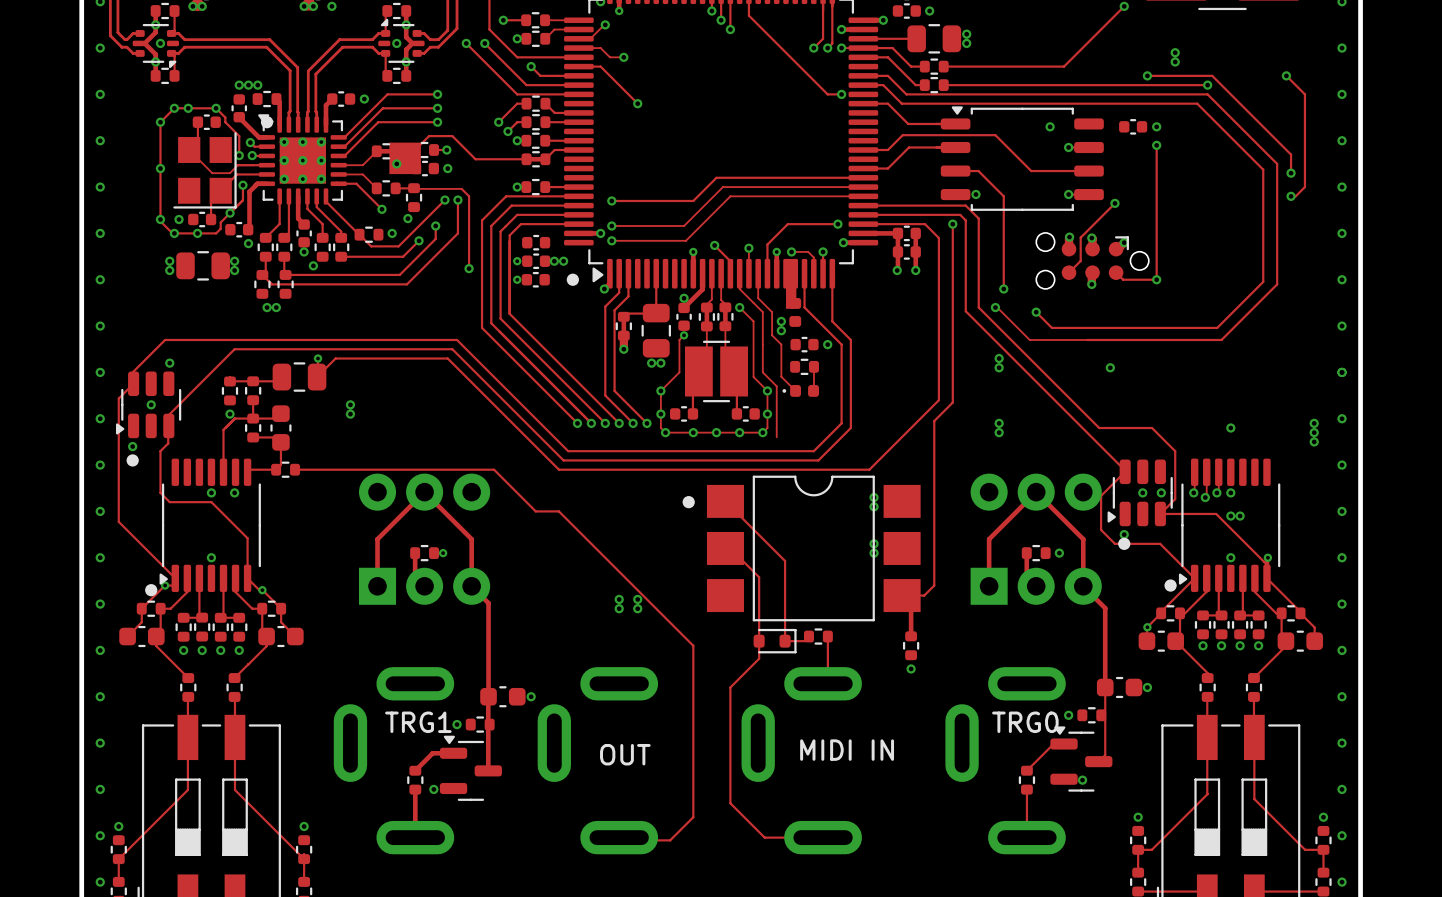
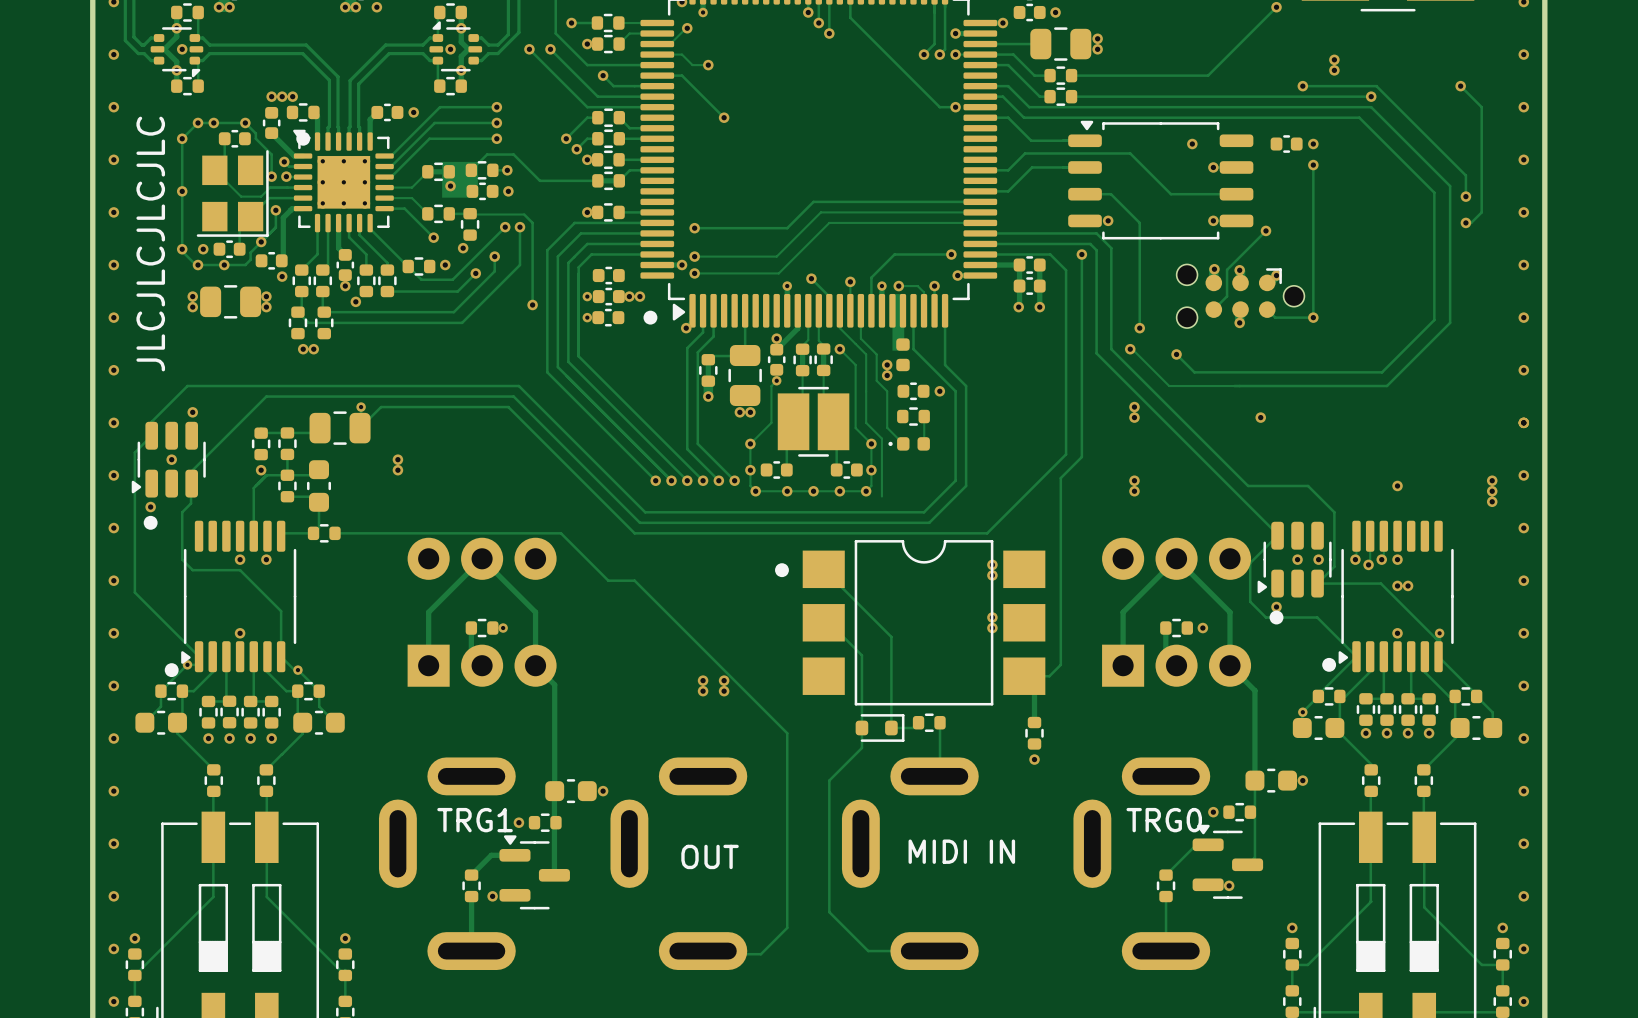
text: none -> JLCJLCJLCJLC (150, 244)

